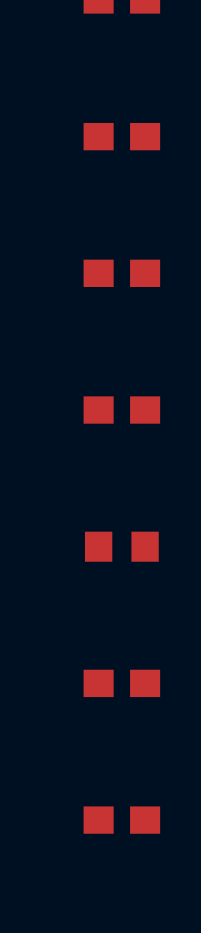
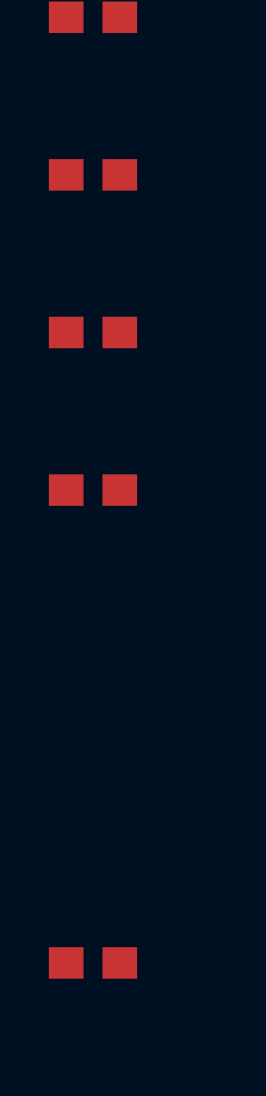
part: (121, 546) -> none
part: (121, 683) -> none

